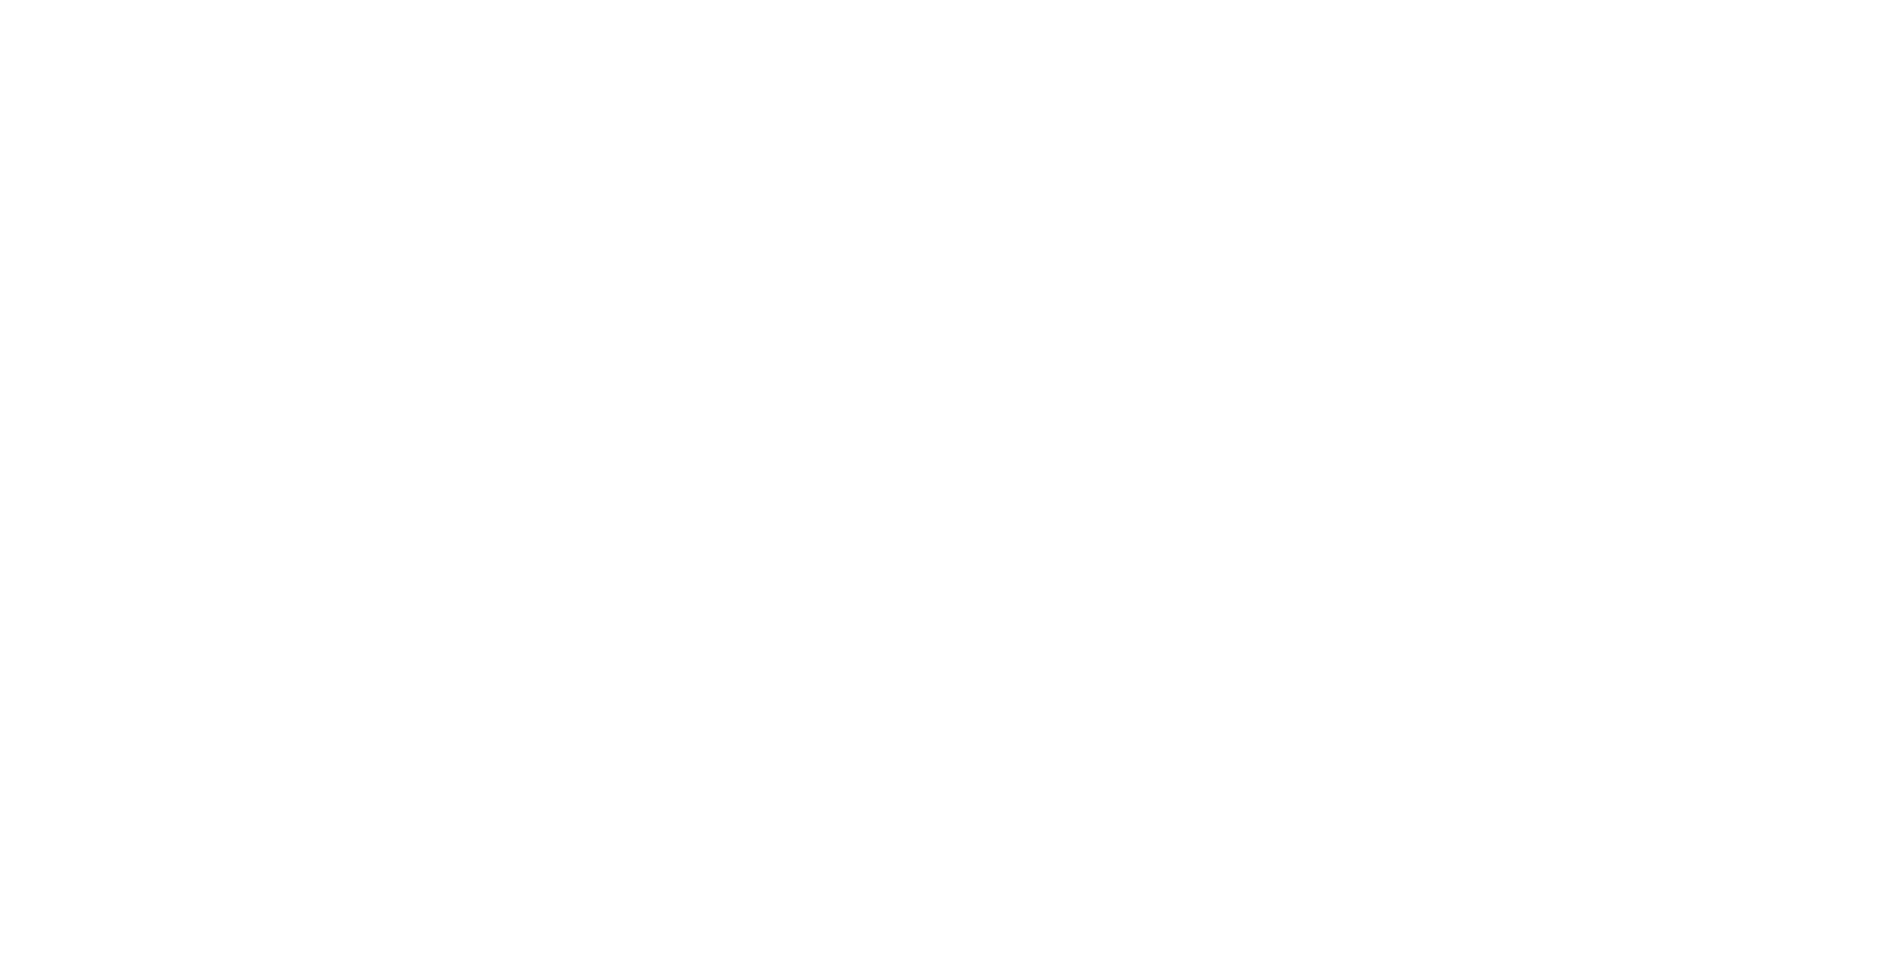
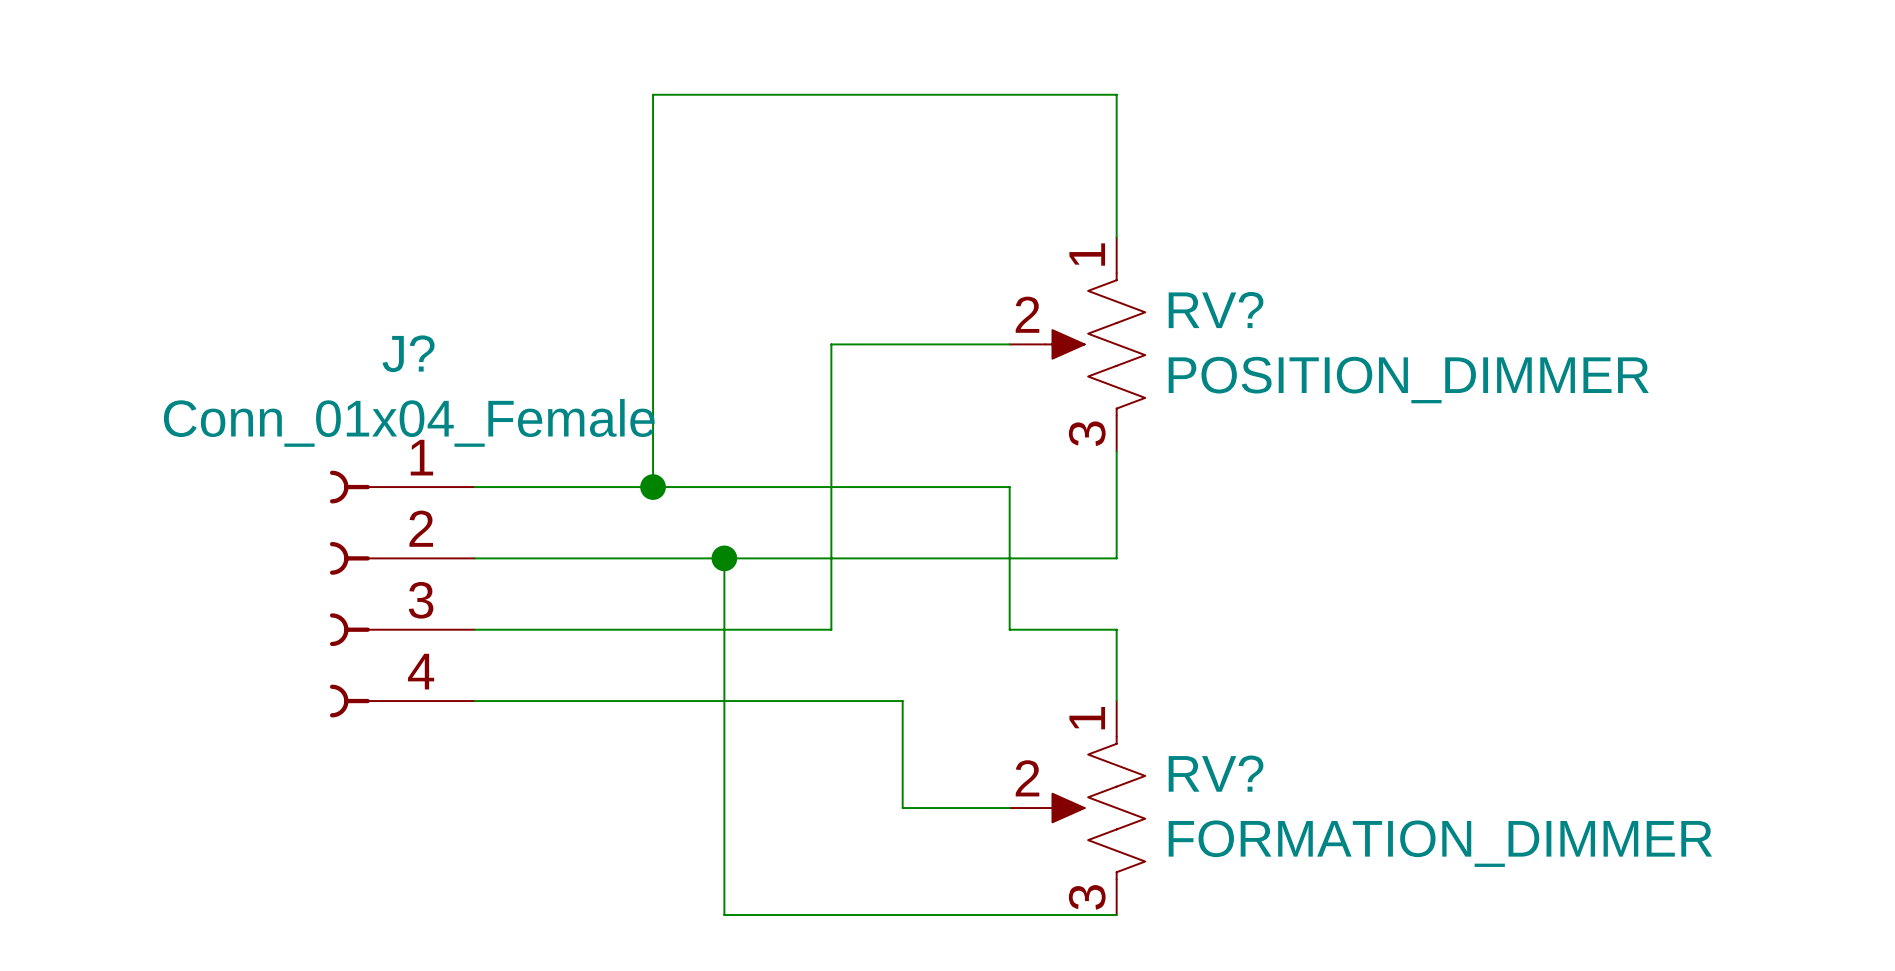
wire: none -> (1116, 237) (1116, 94) (653, 94) (653, 487)
wire: none -> (1009, 344) (831, 344) (831, 629) (474, 629)
RV?: none -> POSITION_DIMMER (1077, 344)
wire: none -> (1116, 451) (1116, 558) (474, 558)
wire: none -> (474, 487) (1009, 487) (1009, 629) (1116, 629) (1116, 701)
junction: none -> (653, 487)
wire: none -> (724, 558) (724, 915) (1116, 915)
junction: none -> (724, 558)
J?: none -> Conn_01x04_Female (402, 594)
wire: none -> (474, 701) (902, 701) (902, 808) (1009, 808)
RV?: none -> FORMATION_DIMMER (1077, 808)

